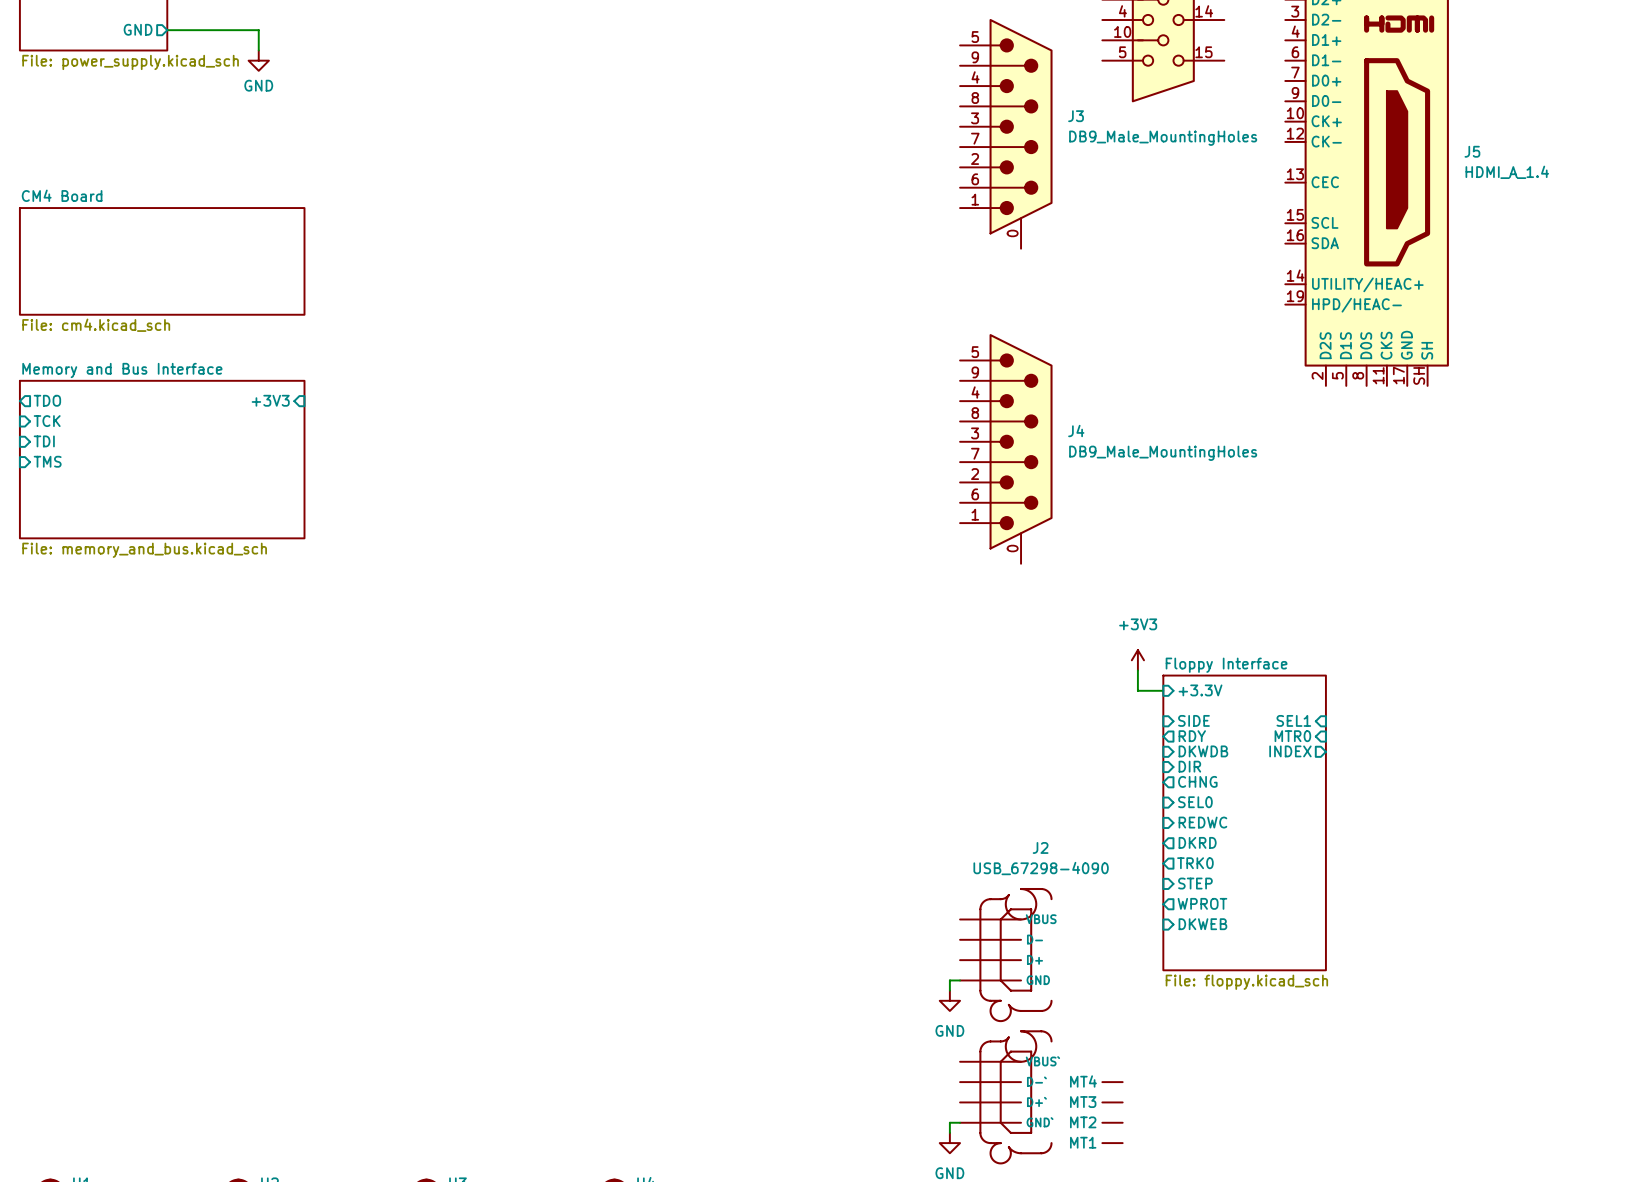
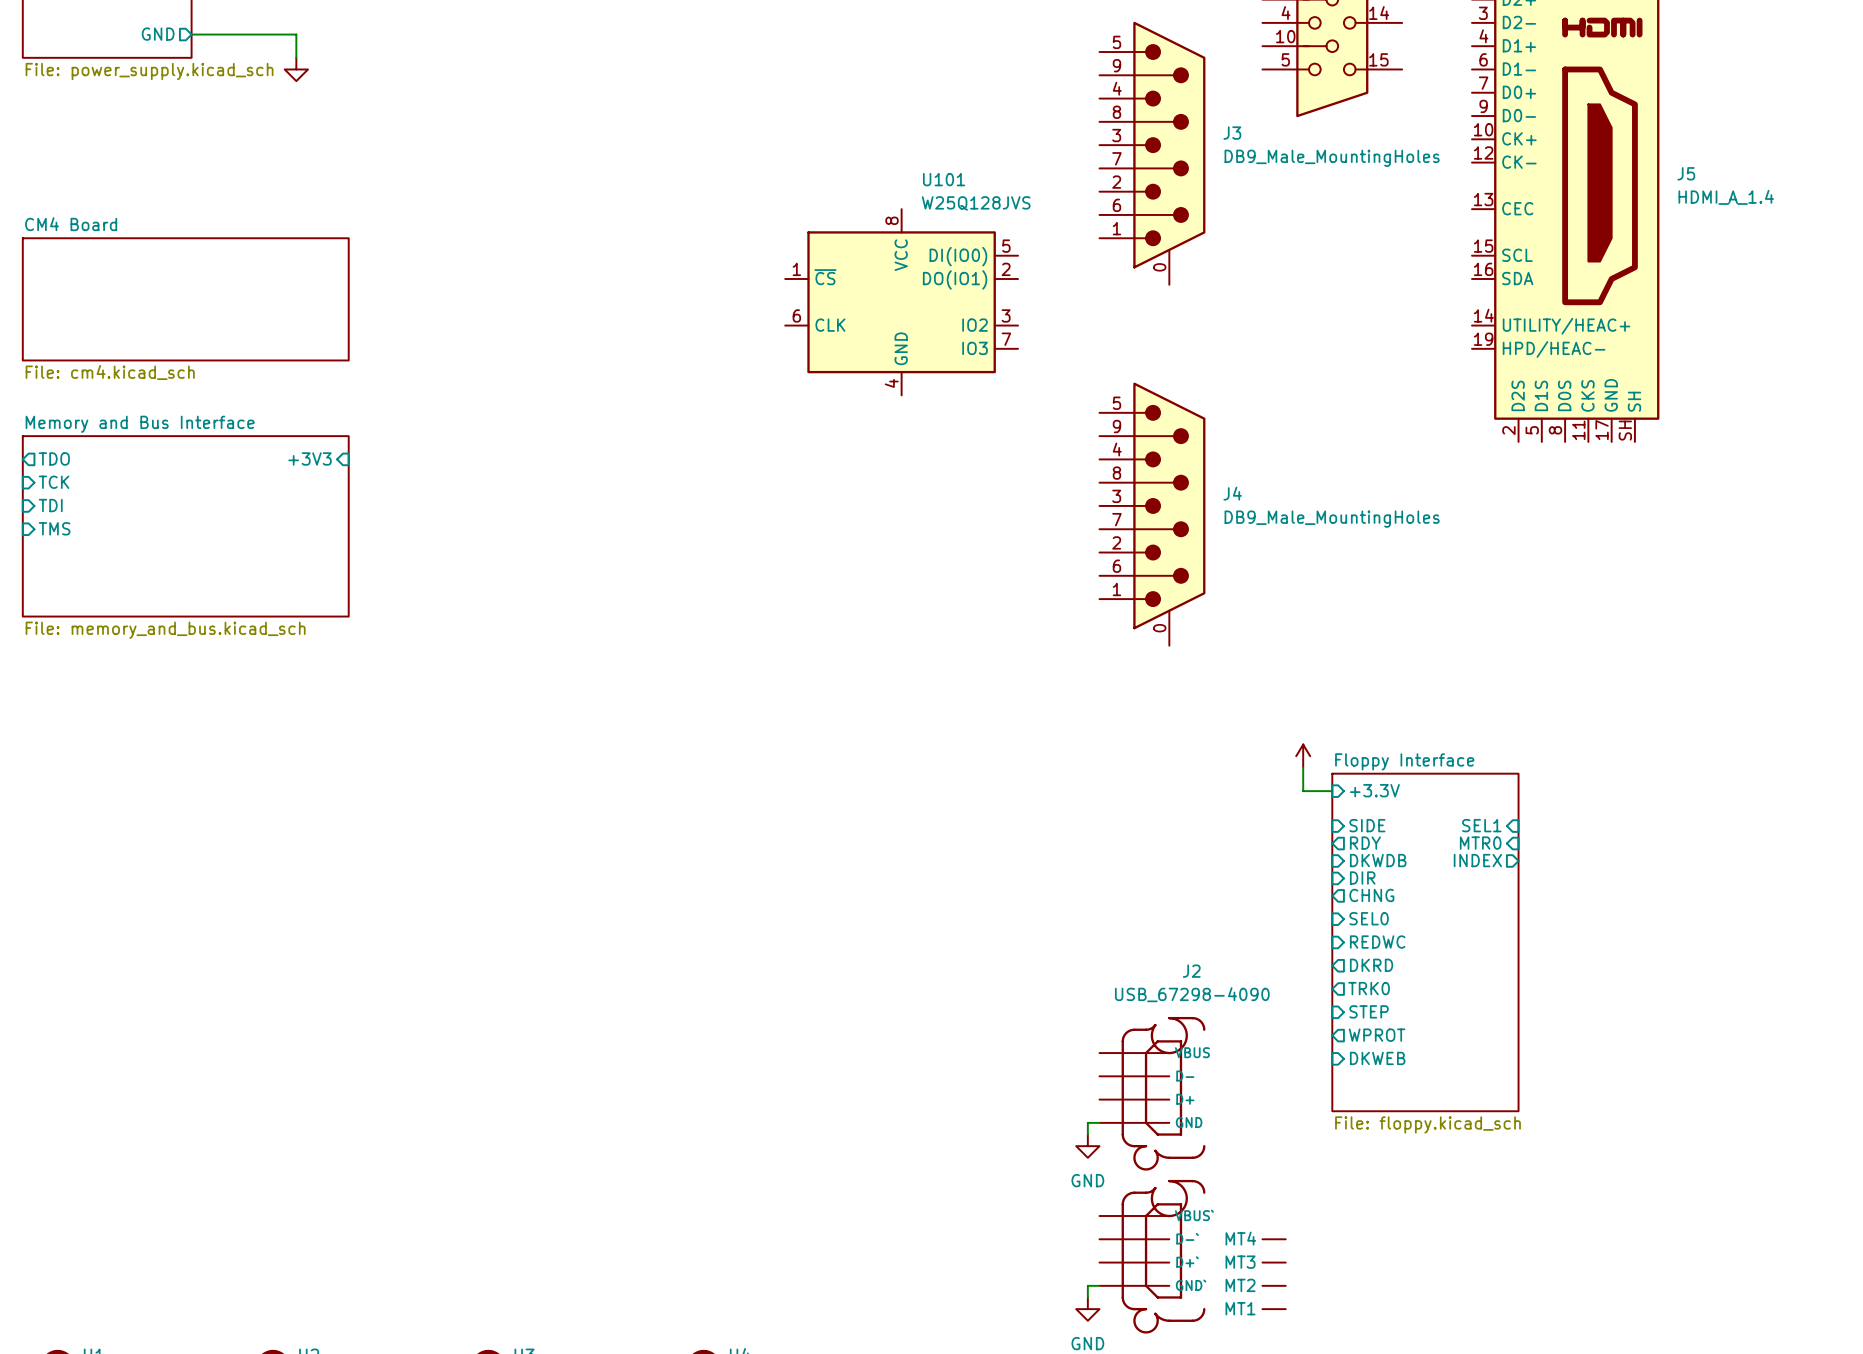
power symbol text: GND (258, 85) -> none
U101: none -> W25Q128JVS (901, 302)
power symbol text: +3V3 (1138, 624) -> none

